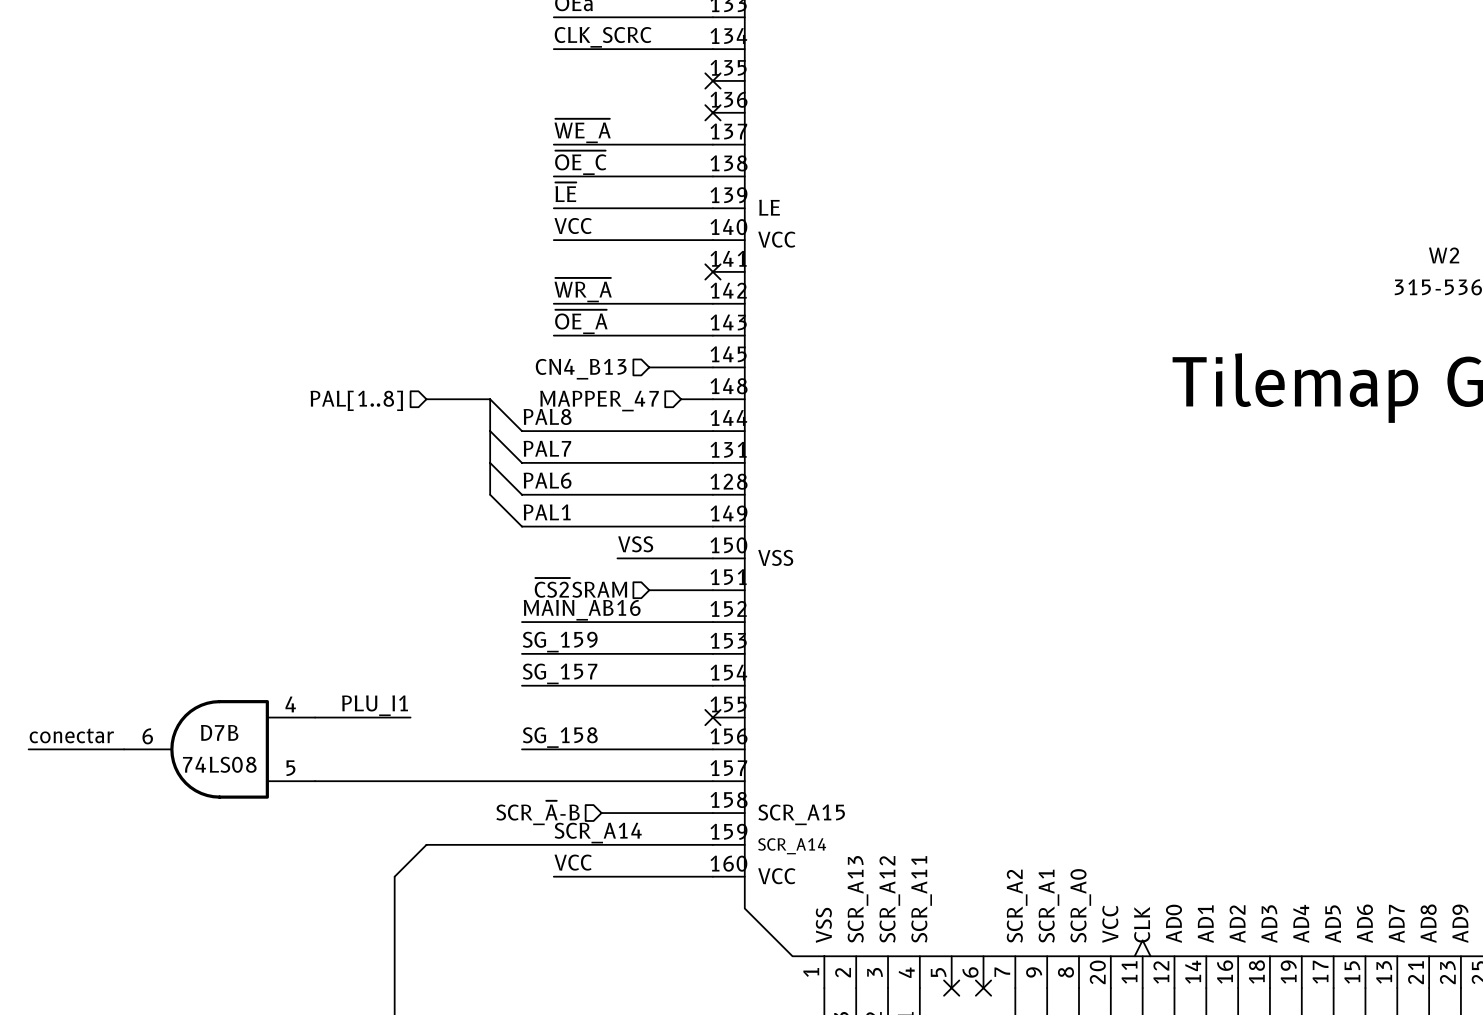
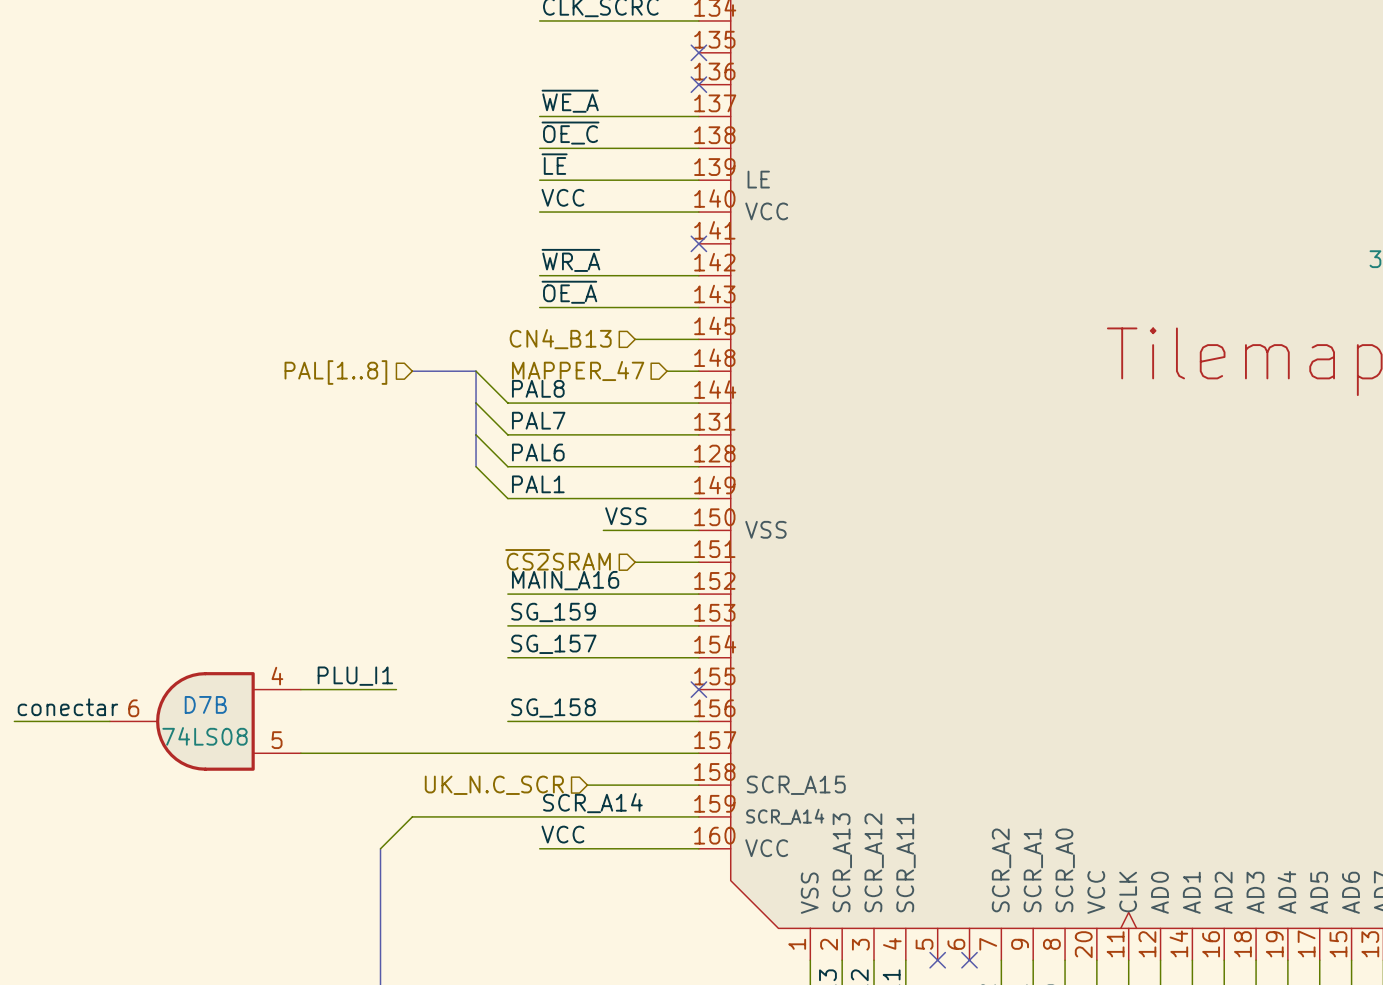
label: MAIN_AB16 (582, 610) -> MAIN_A16 (565, 580)
hierarchical label: SCR_~{A}-B (538, 812) -> UK_N.C_SCR (494, 785)

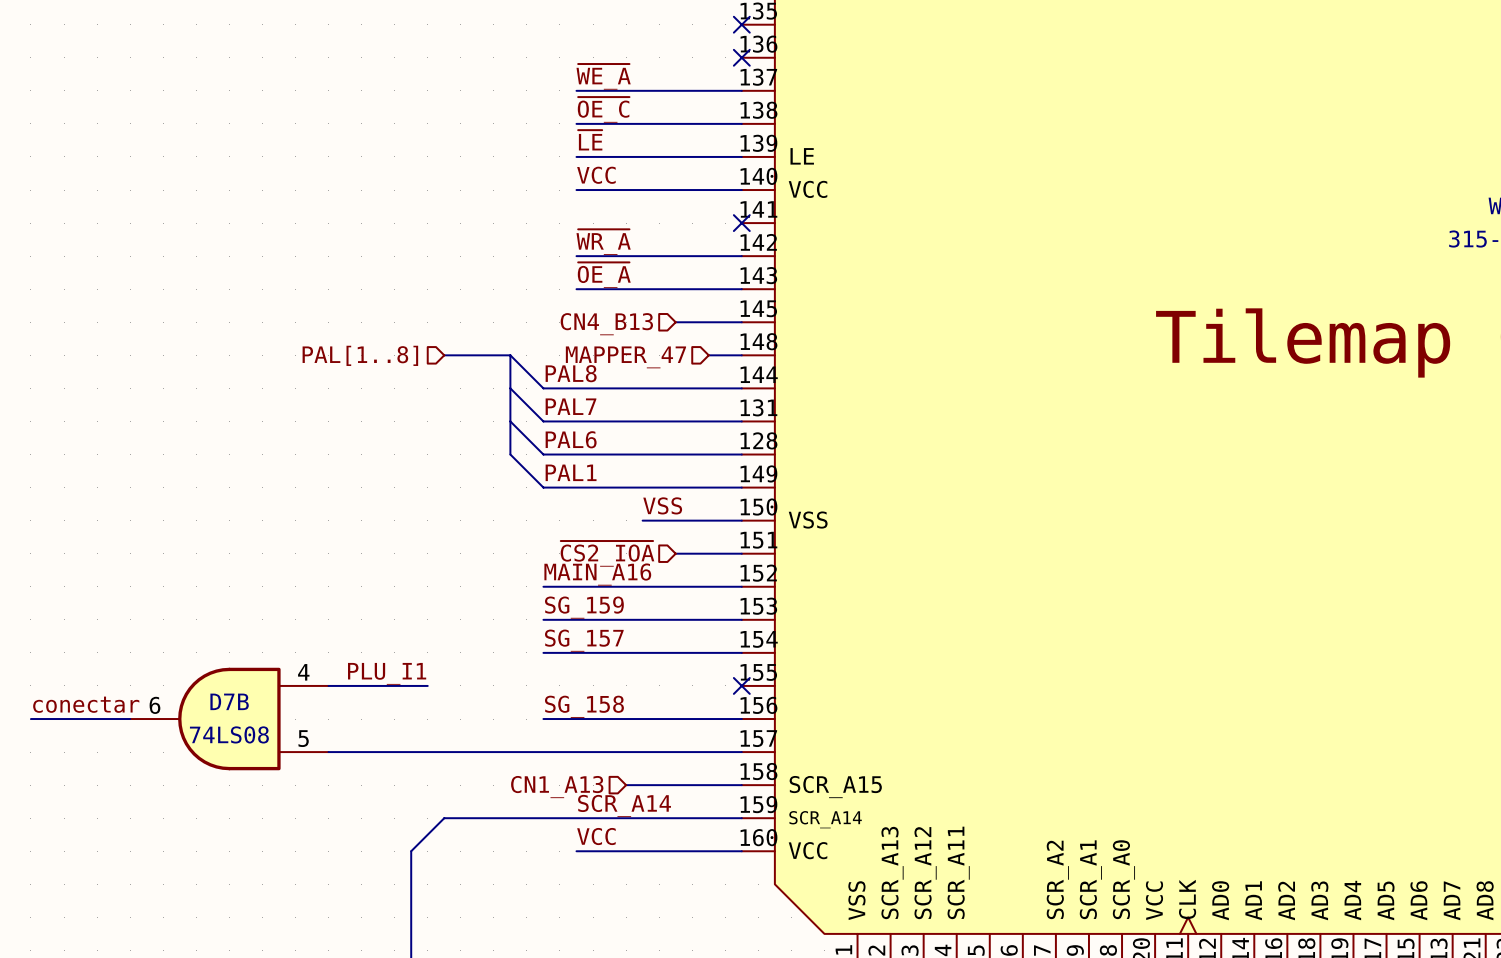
hierarchical label: ~{CS2}SRAM (558, 559) -> ~{CS2_IOA} (607, 553)
hierarchical label: UK_N.C_SCR (494, 785) -> CN1_A13 (557, 787)

